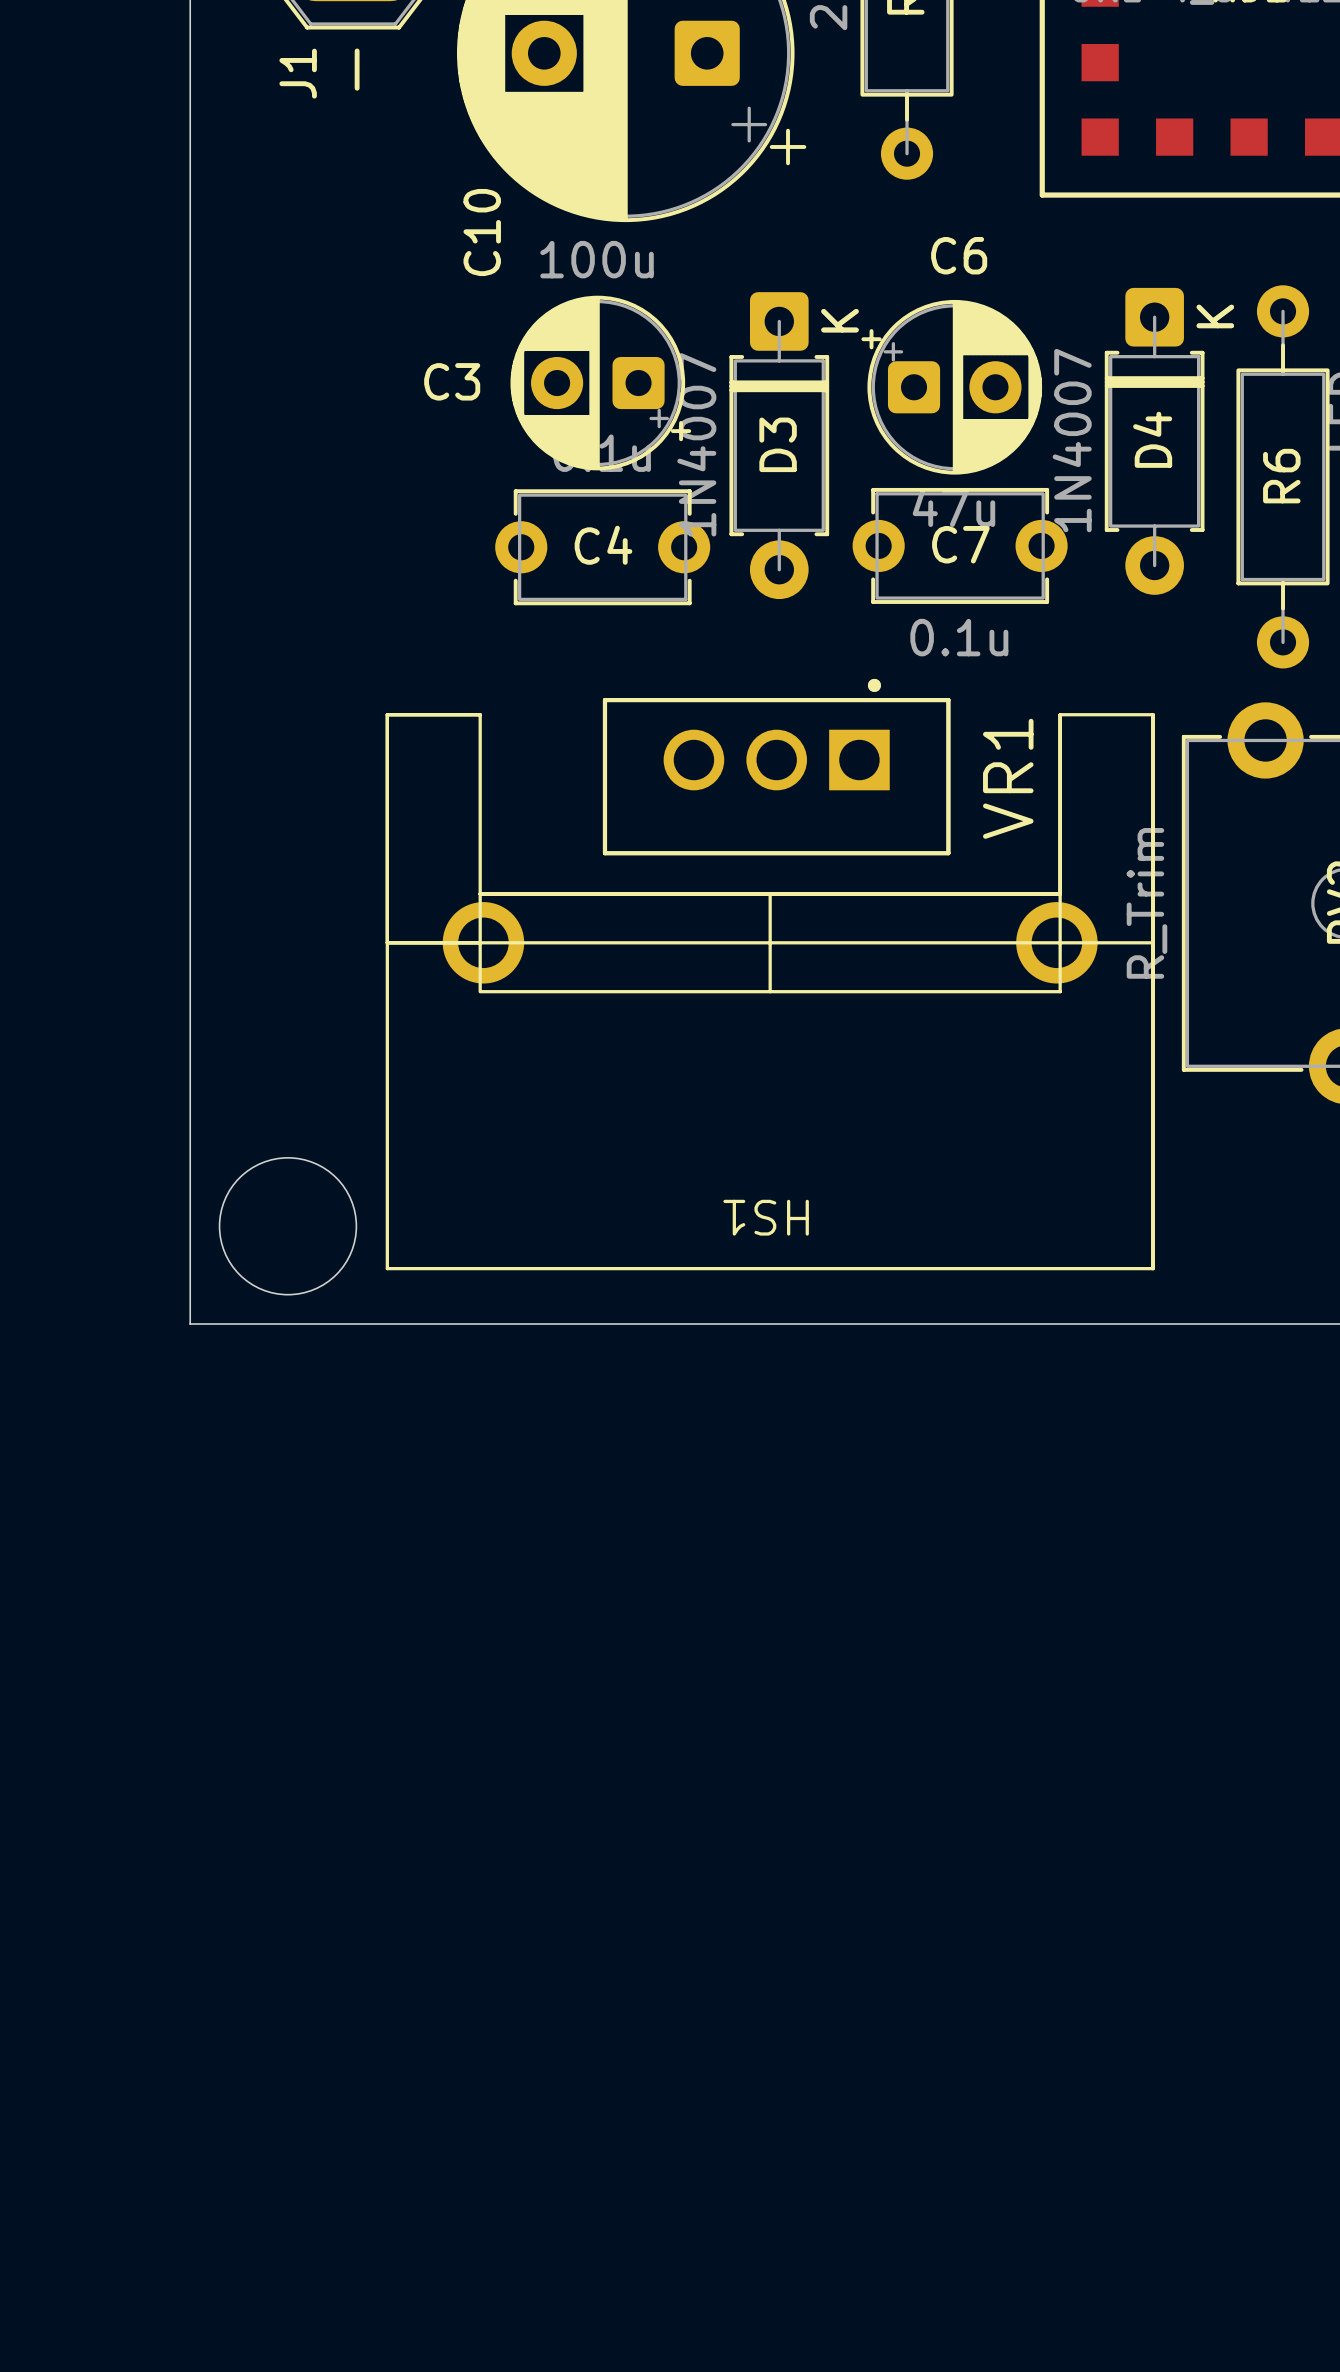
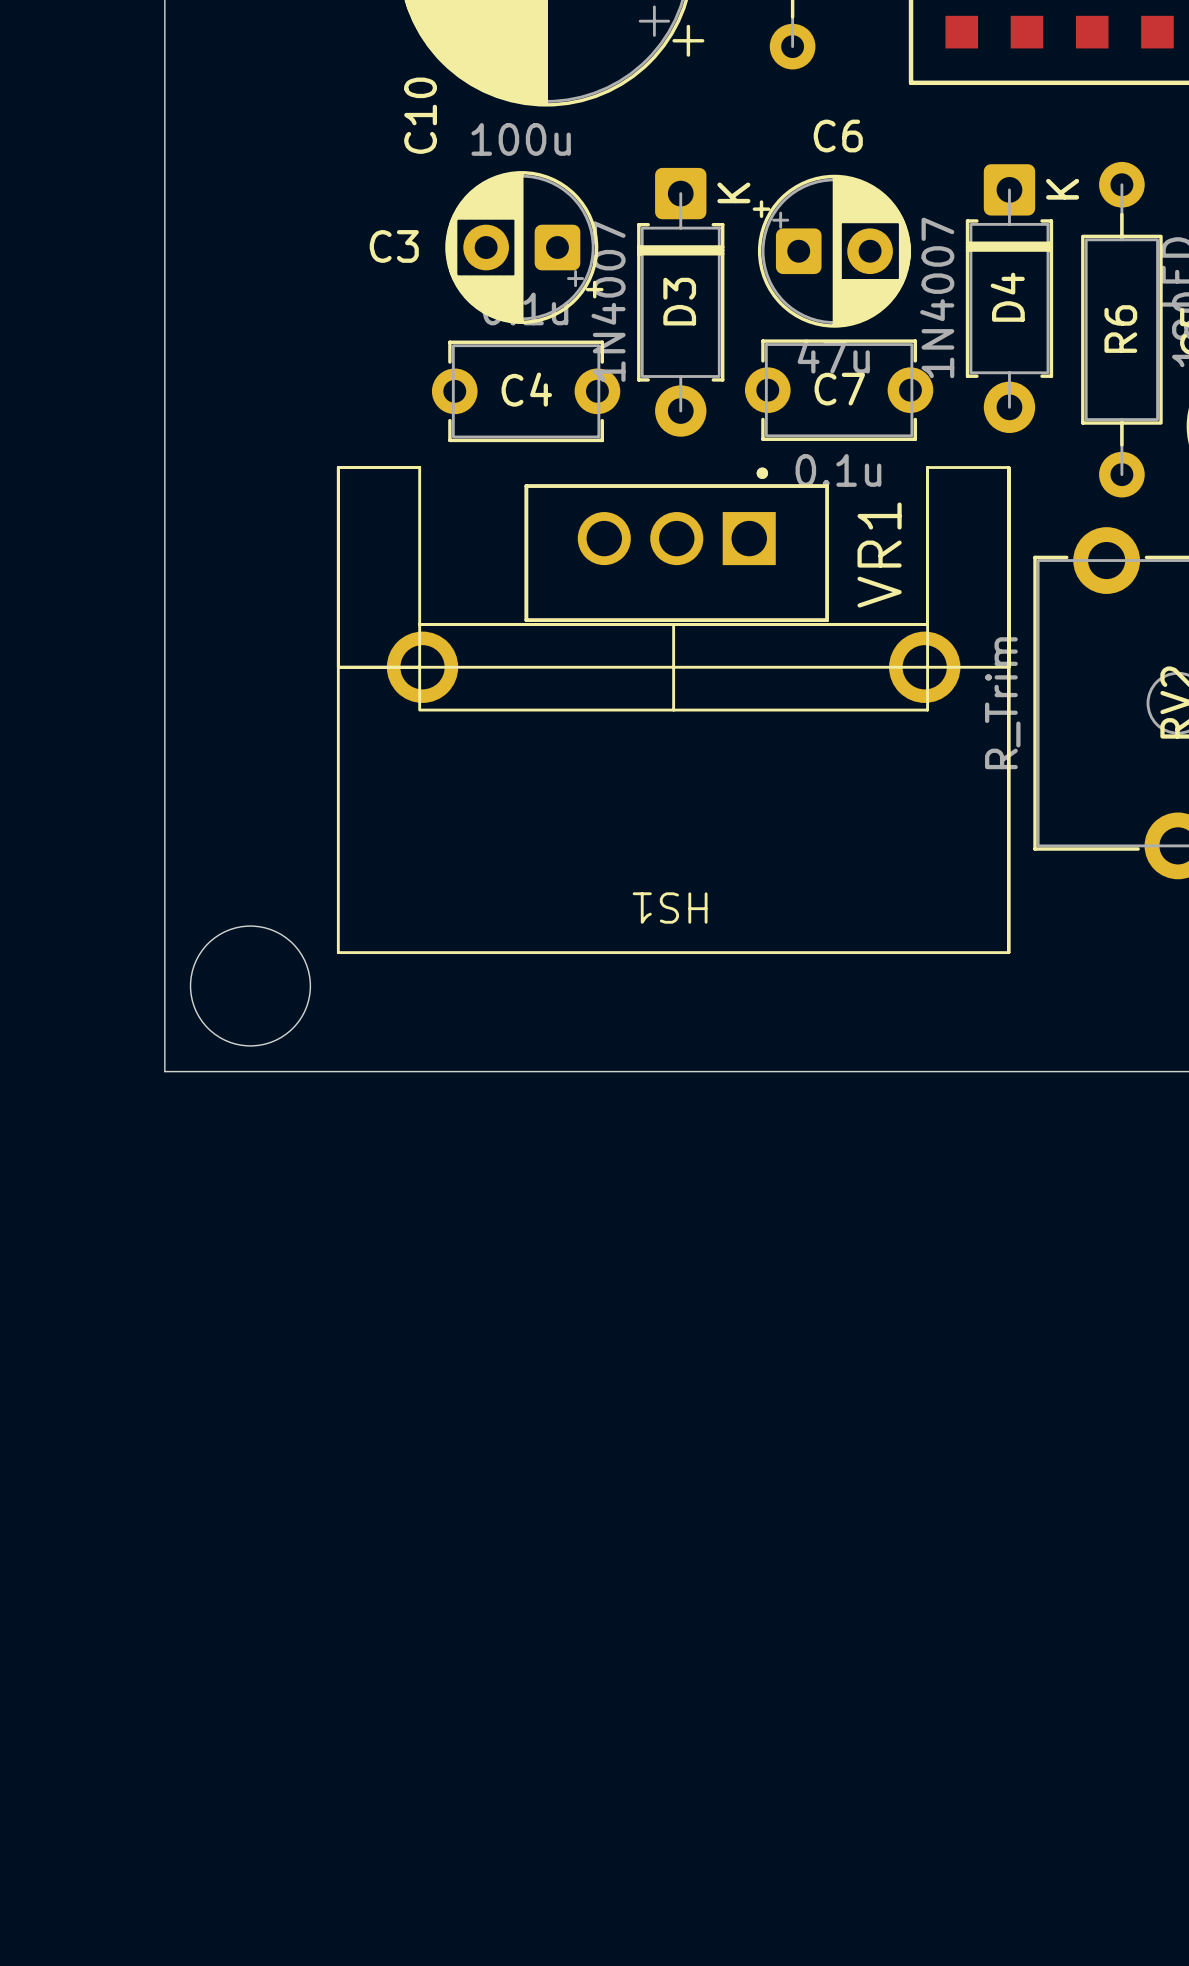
VR1 position: (776, 767) -> (676, 544)
HS1 position: (770, 991) -> (673, 710)

